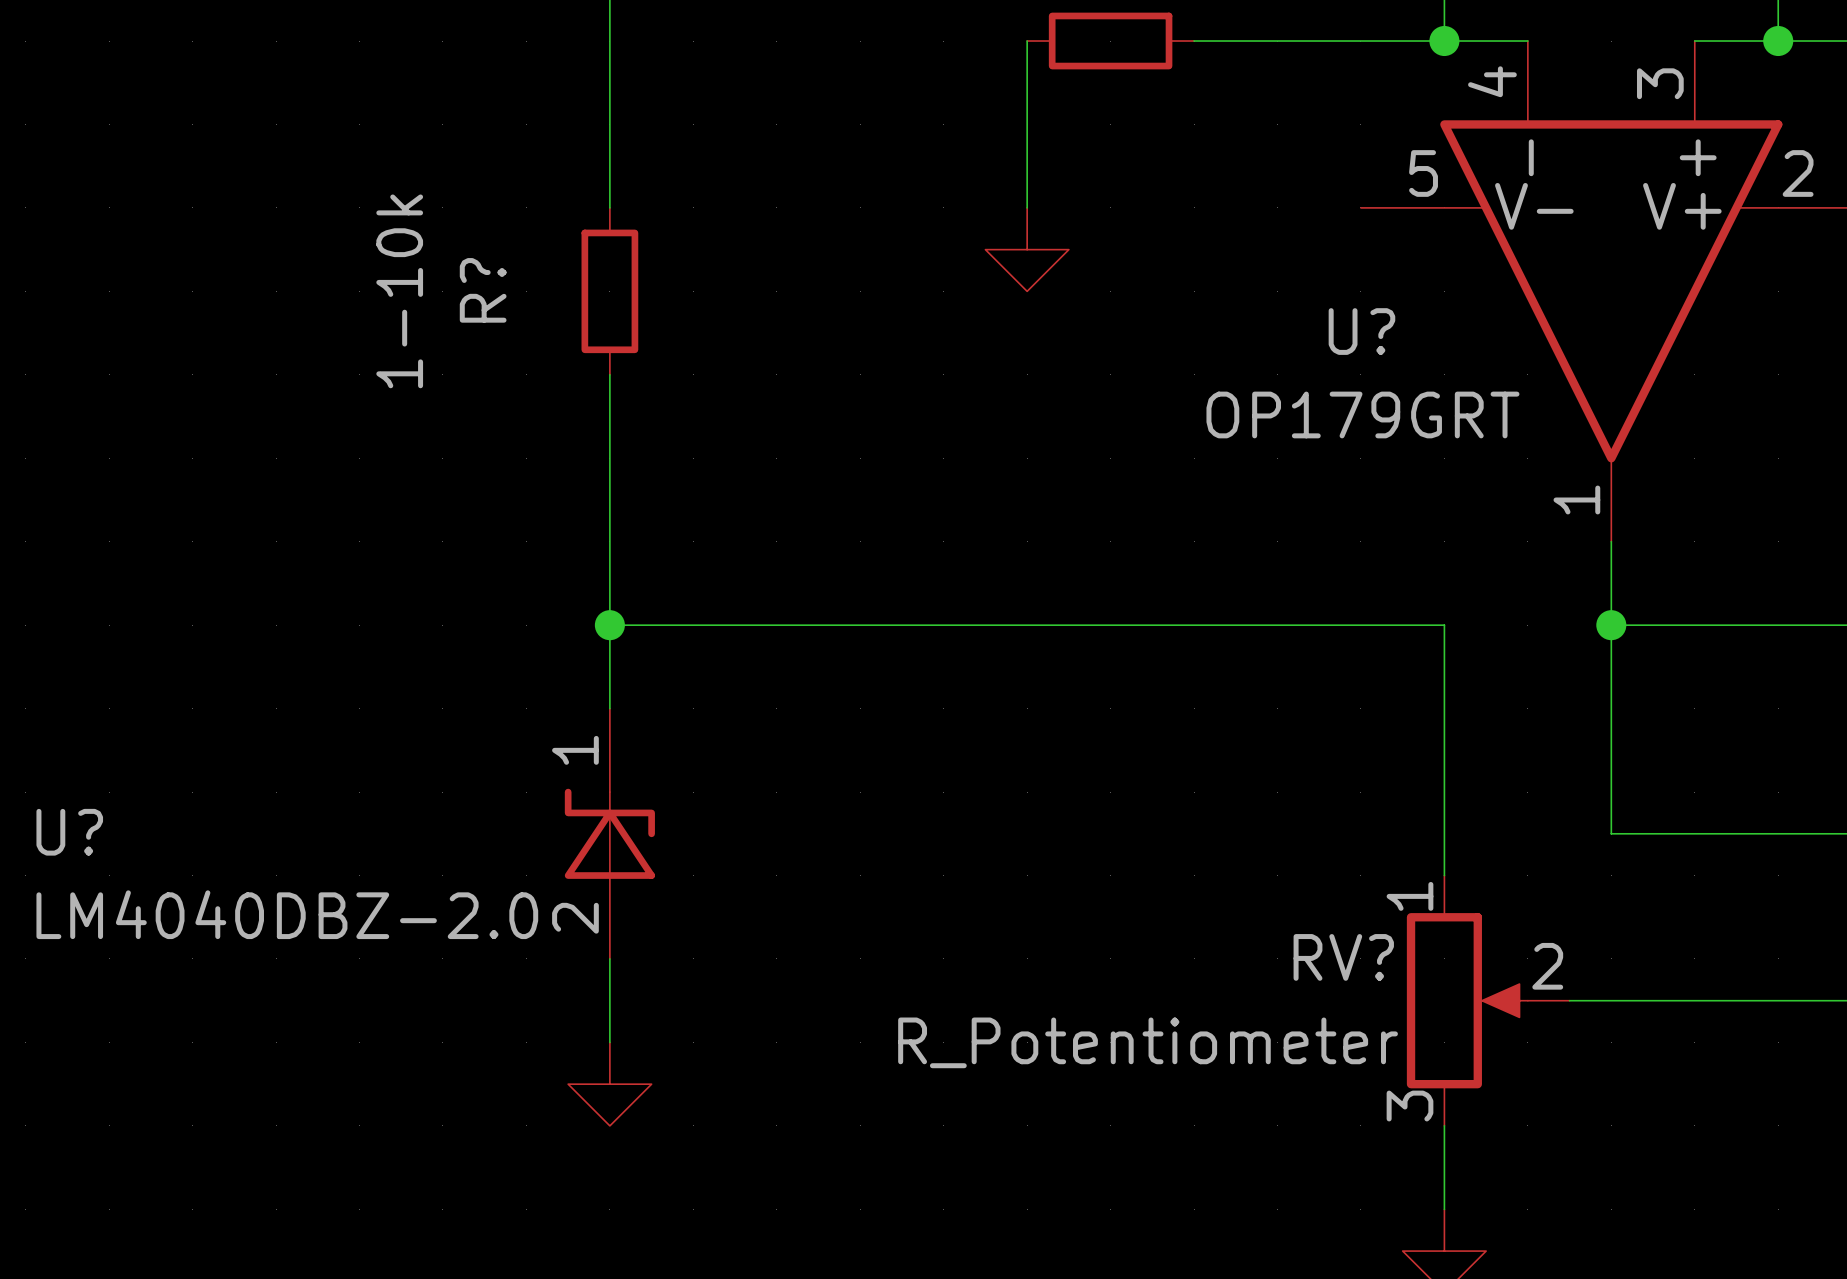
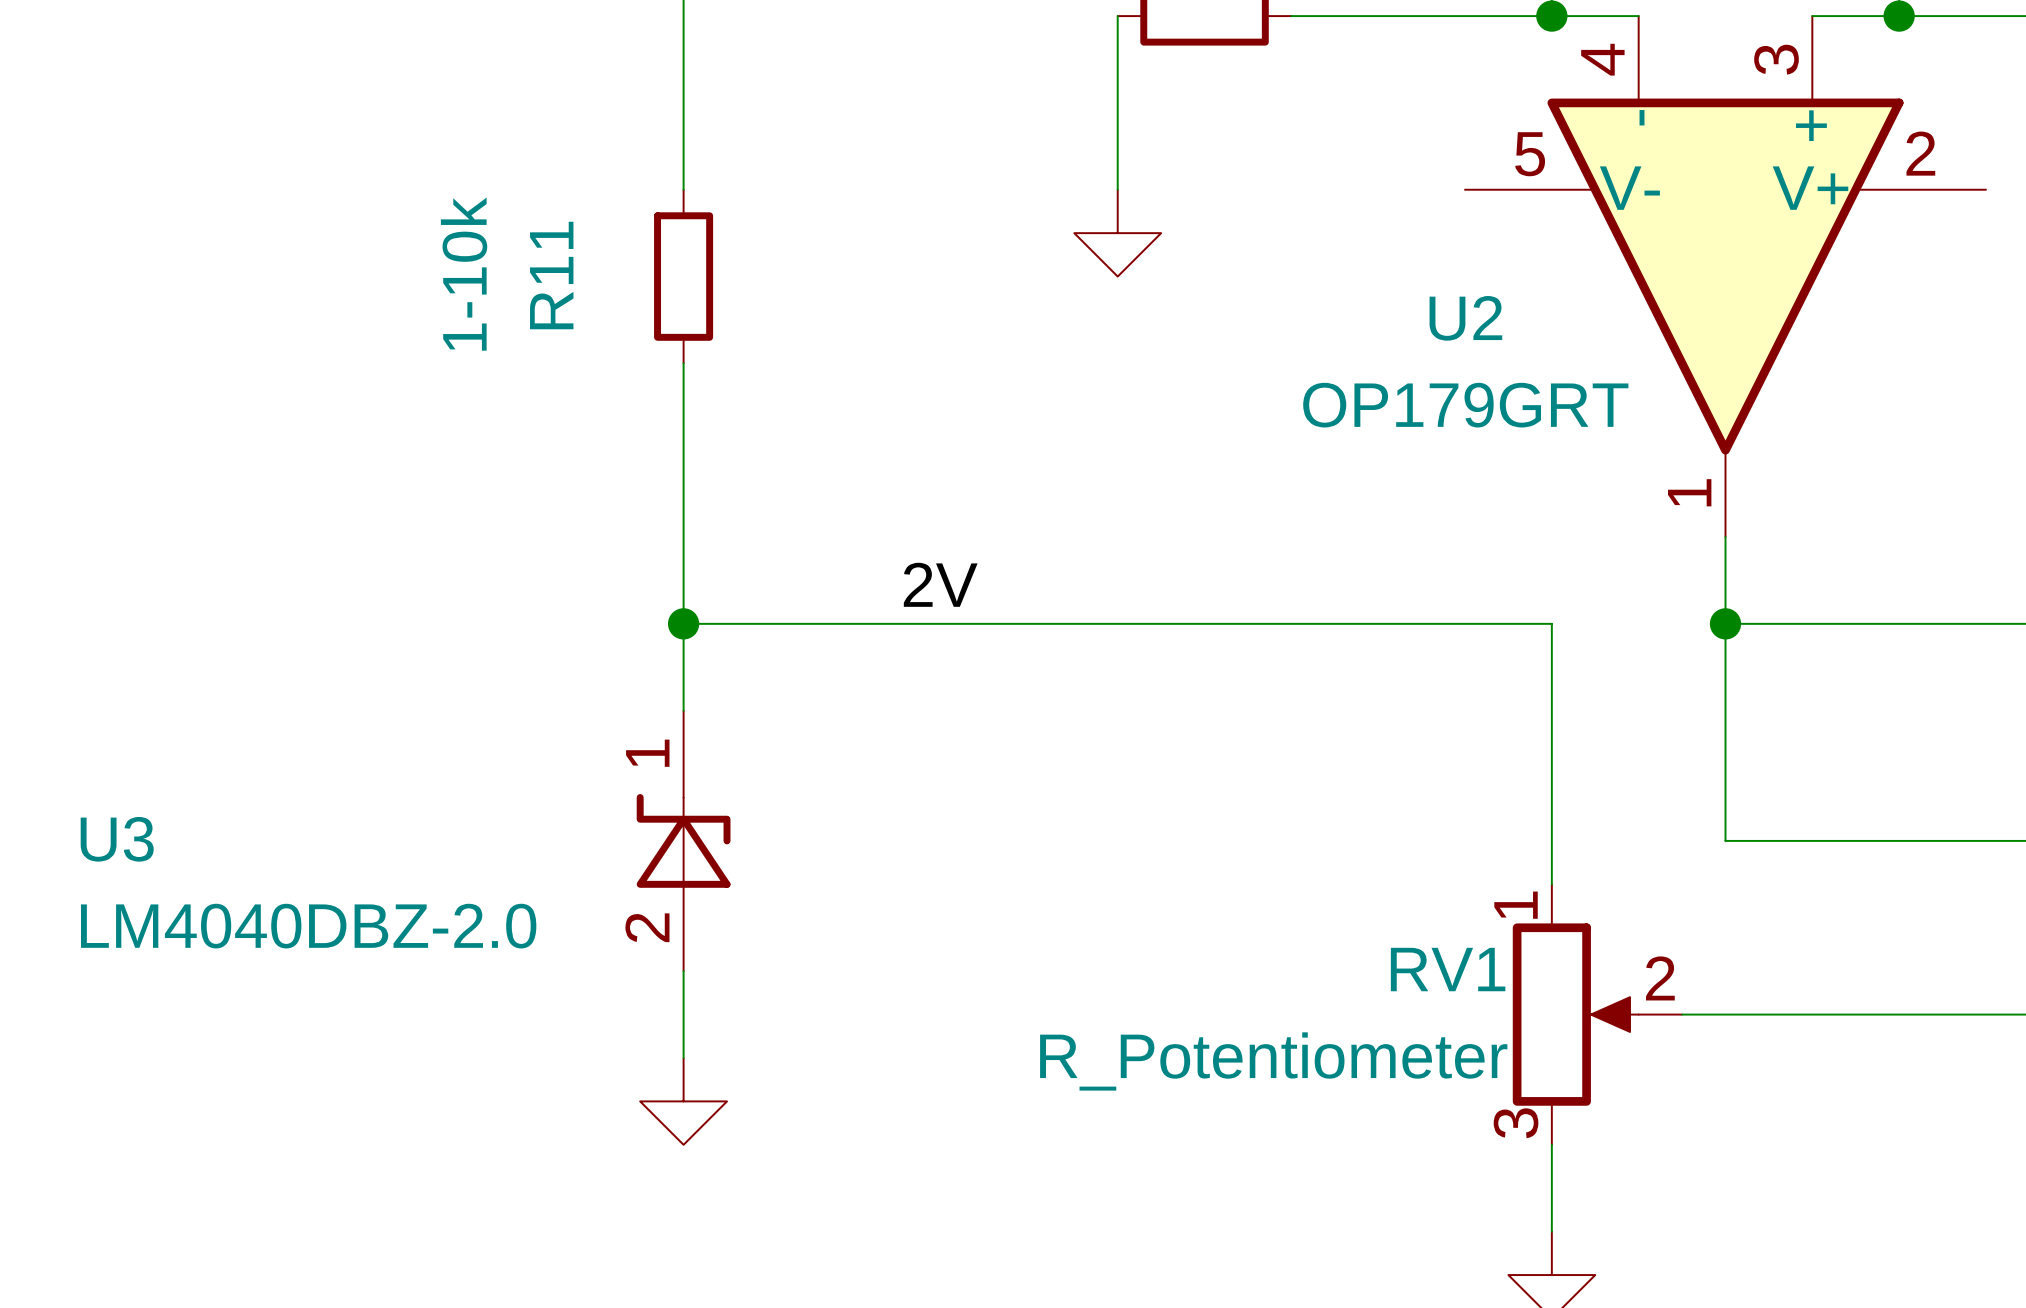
R? name: R? (483, 290) -> R11 (551, 275)
U? name: U? (1361, 331) -> U2 (1465, 318)
label: none -> 2V (940, 584)
U? name: U? (69, 832) -> U3 (117, 839)
RV? name: RV? (1343, 957) -> RV1 (1448, 969)

